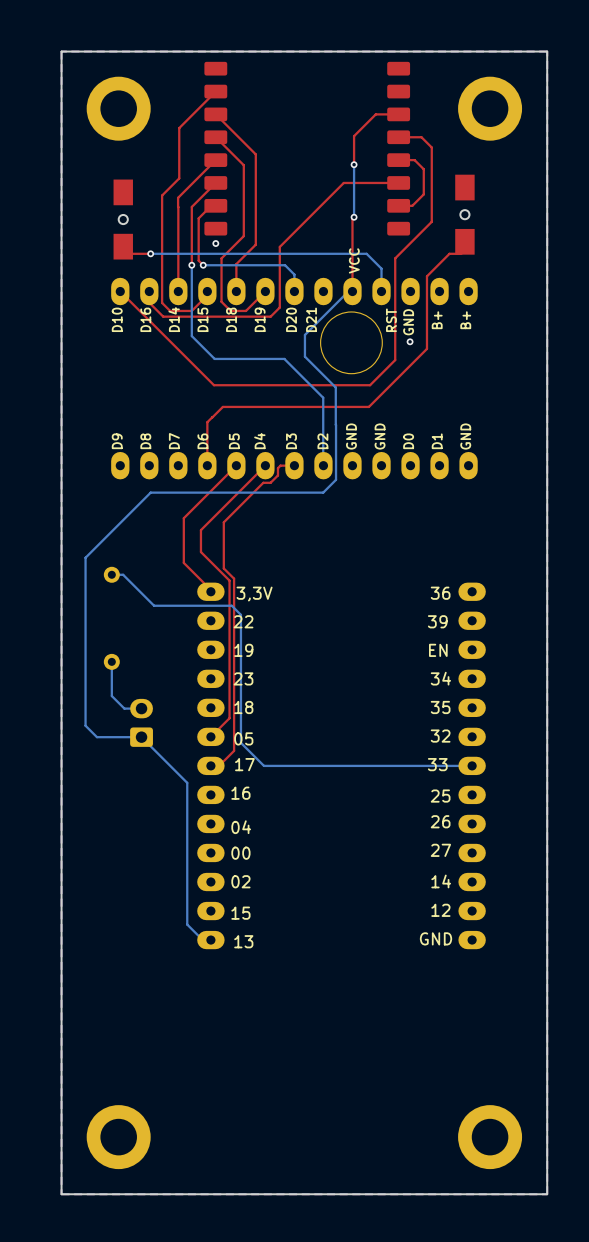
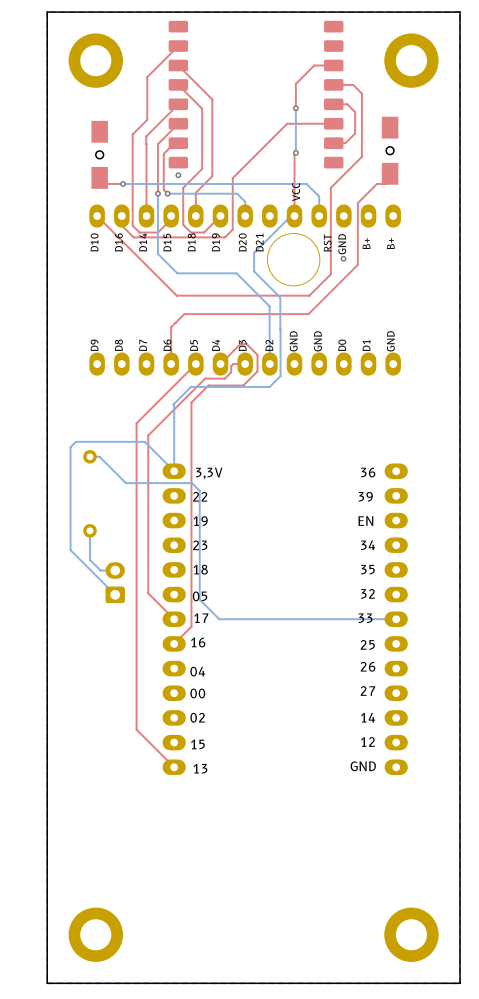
top track: (265, 465) (200, 530) (200, 552) (229, 580) (229, 718) (210, 736) -> (220, 364) (240, 344) (246, 344) (257, 354) (257, 371) (243, 385) (208, 385) (191, 402) (191, 626) (174, 643)
top track: (263, 482) (223, 522) (223, 568) (234, 578) (234, 750) (219, 765) (210, 765) -> (218, 378) (205, 378) (148, 435) (148, 593) (174, 619)
bottom track: (230, 492) (150, 492) (85, 557) (85, 725) (96, 737) (141, 737) (187, 782) (187, 924) (202, 940) -> (190, 386) (173, 404) (174, 471) (144, 441) (75, 441) (70, 447) (70, 550) (115, 594)
top track: (183, 518) (183, 562) (212, 591) (210, 591) -> (151, 408) (136, 423) (136, 729) (174, 767)

